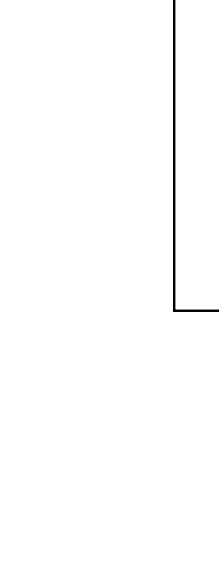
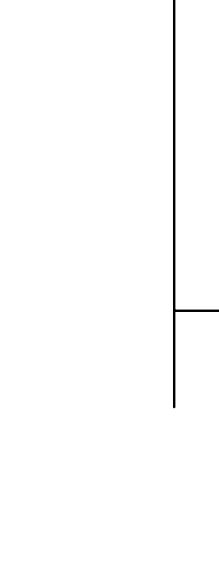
board edge: none -> (174, 310) (174, 407)

